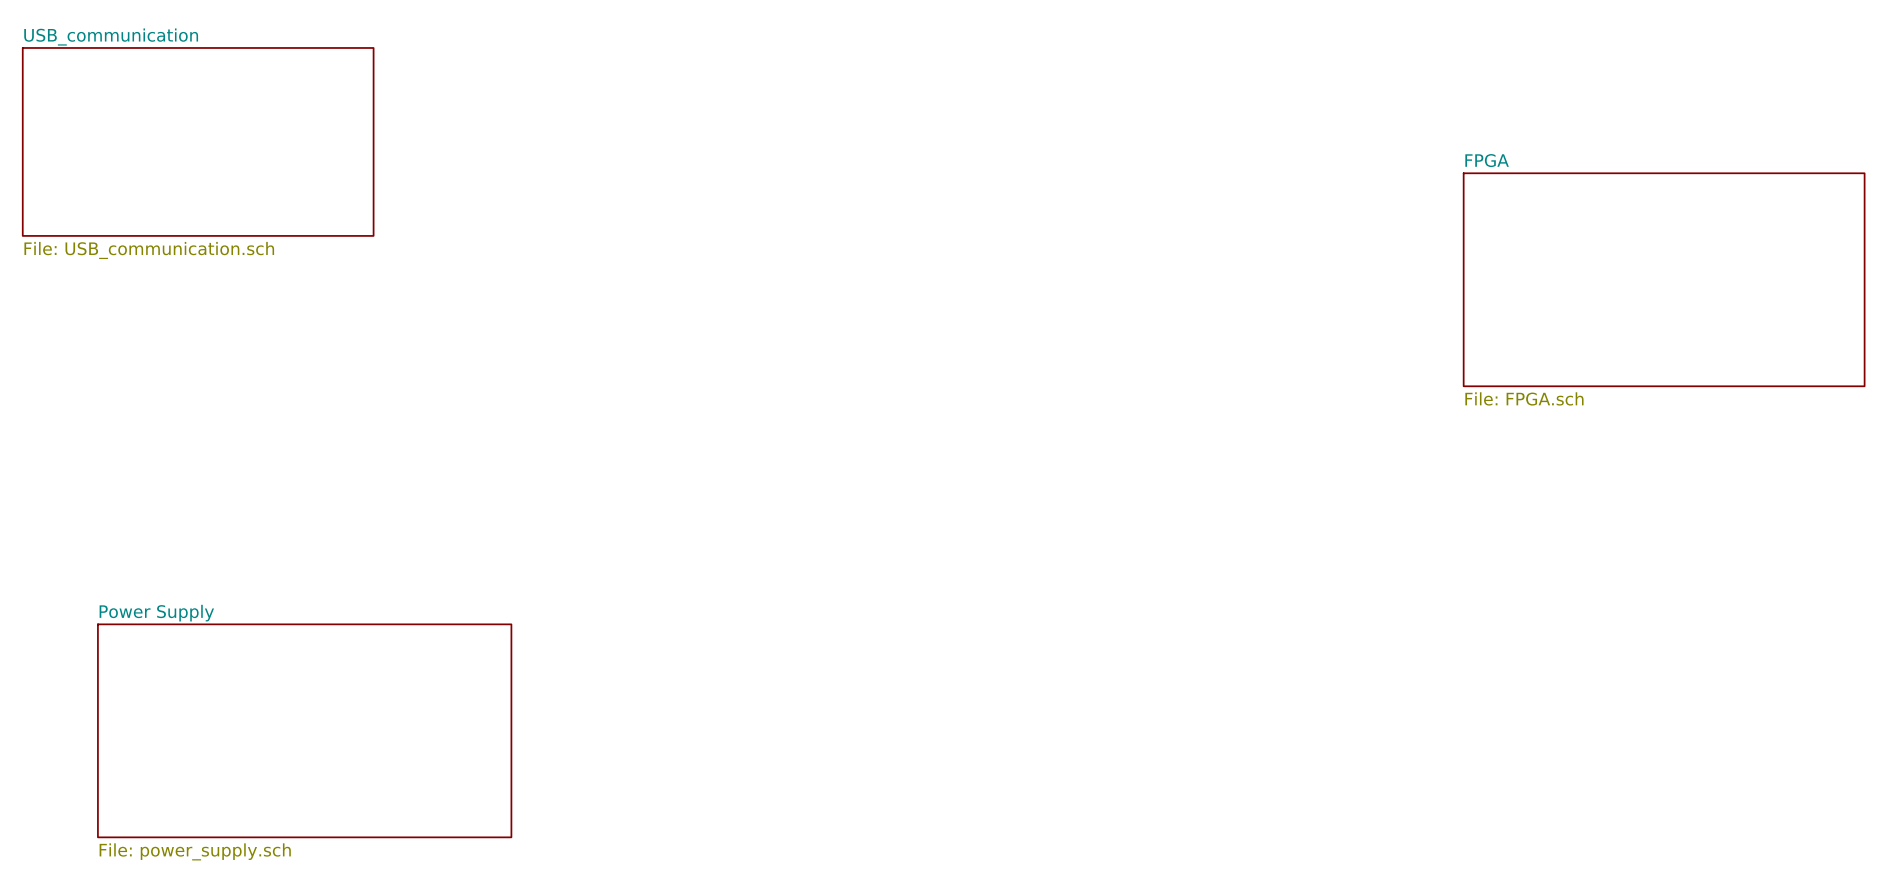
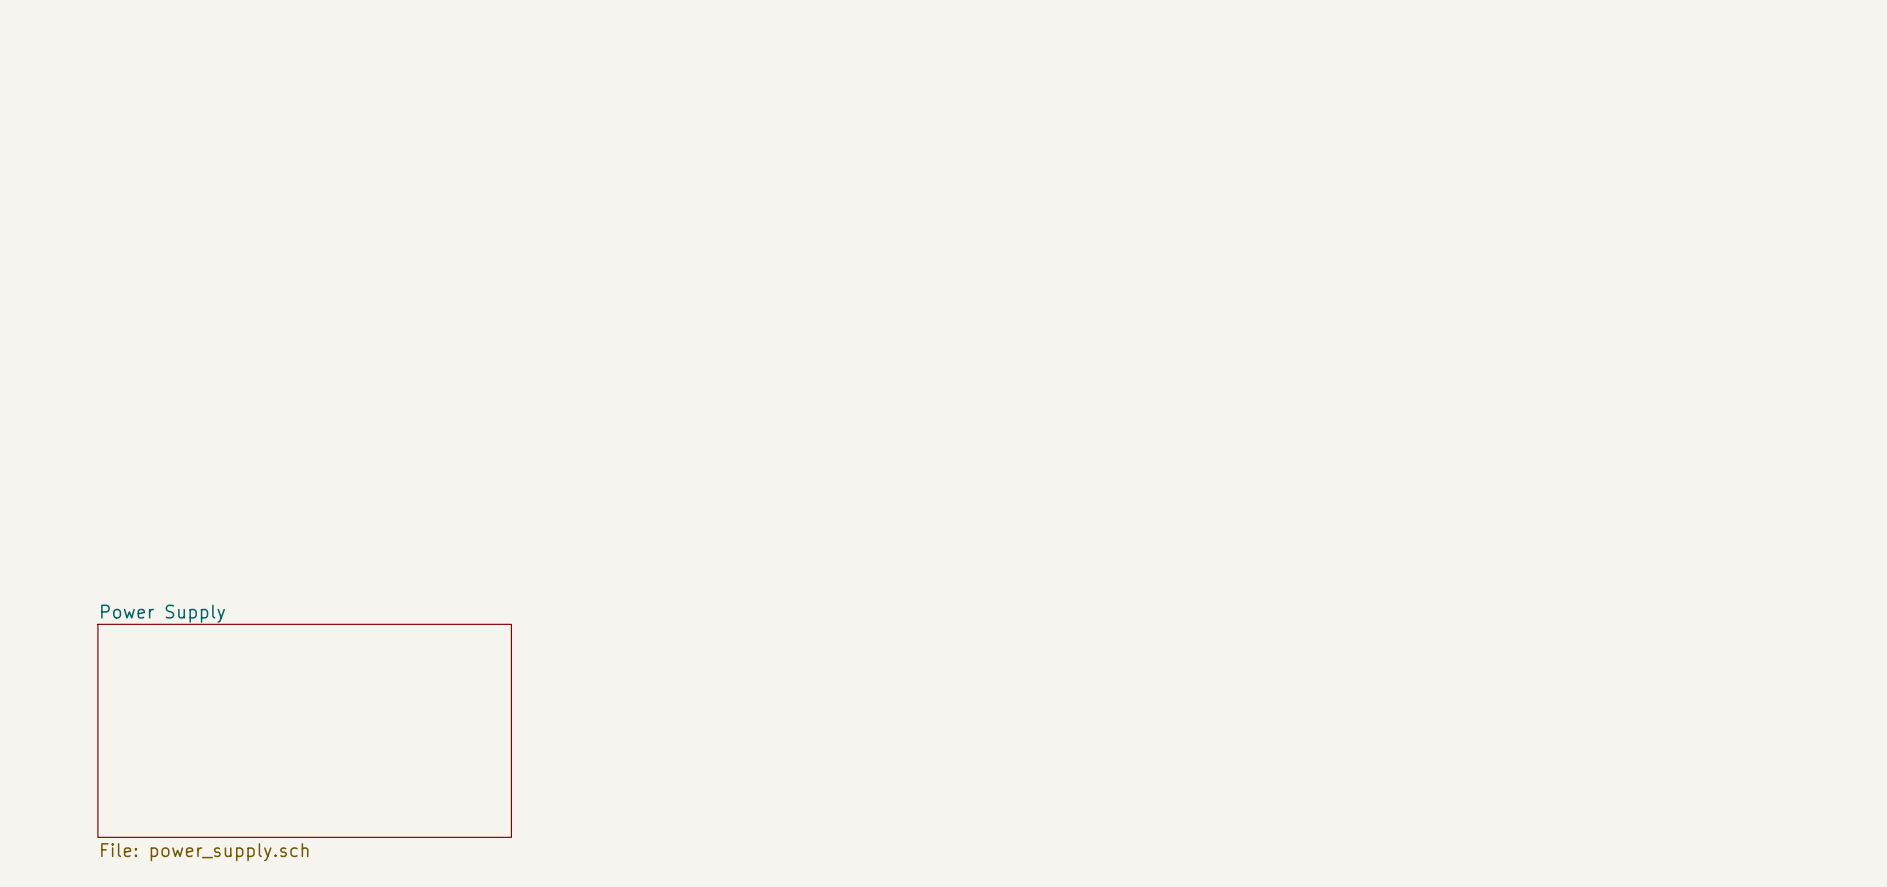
sheet USB_communication: File: USB_communication.sch (198, 141) -> none
sheet FPGA: File: FPGA.sch (1664, 279) -> none

